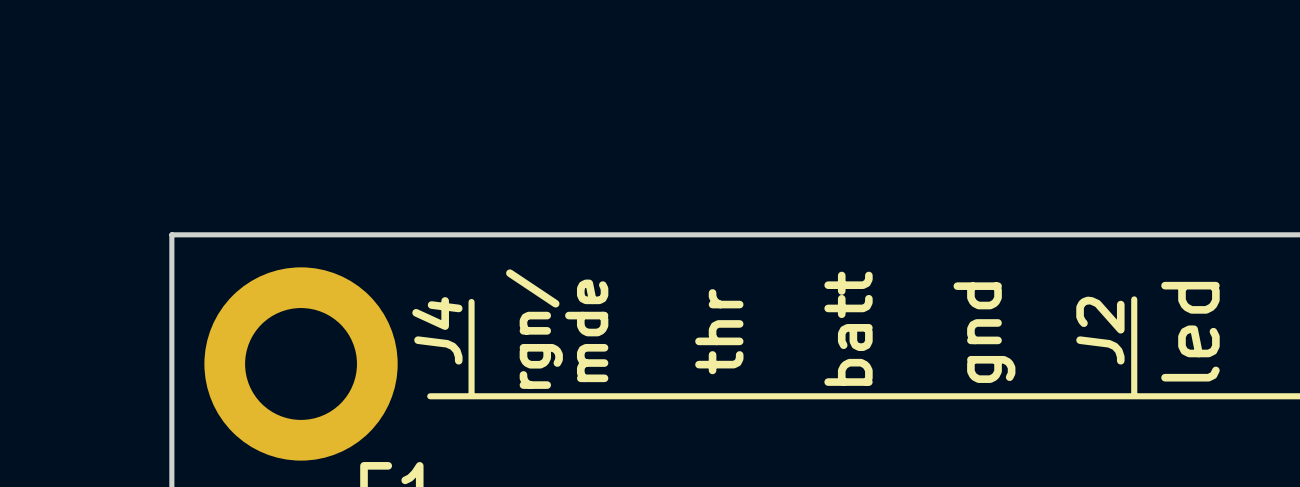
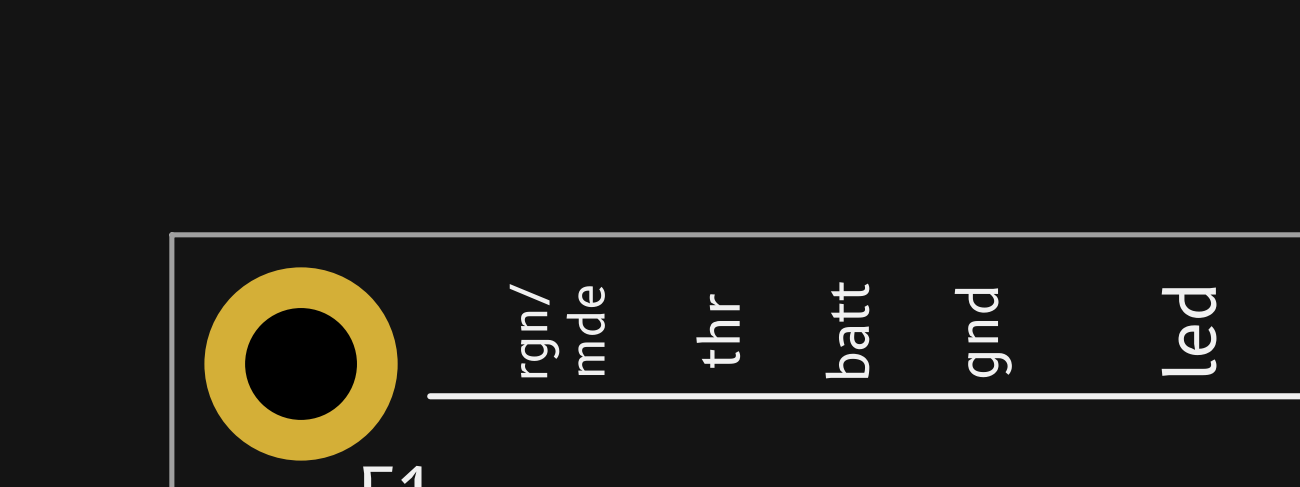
line: (1134, 299) (1134, 393) -> none
line: (471, 301) (471, 395) -> none
text: J4 (437, 330) -> none
text: J2 (1100, 330) -> none

